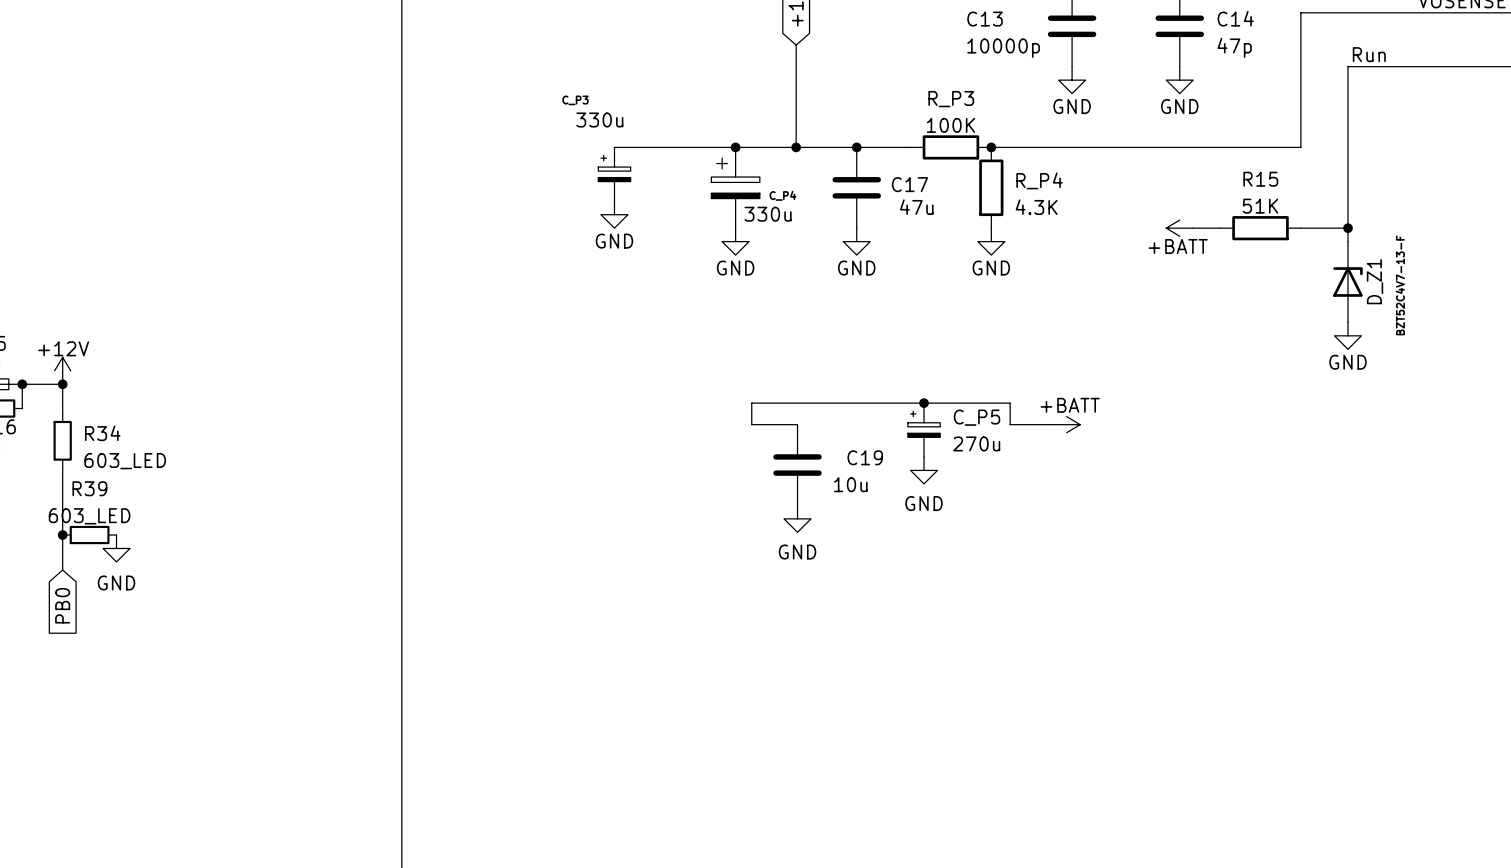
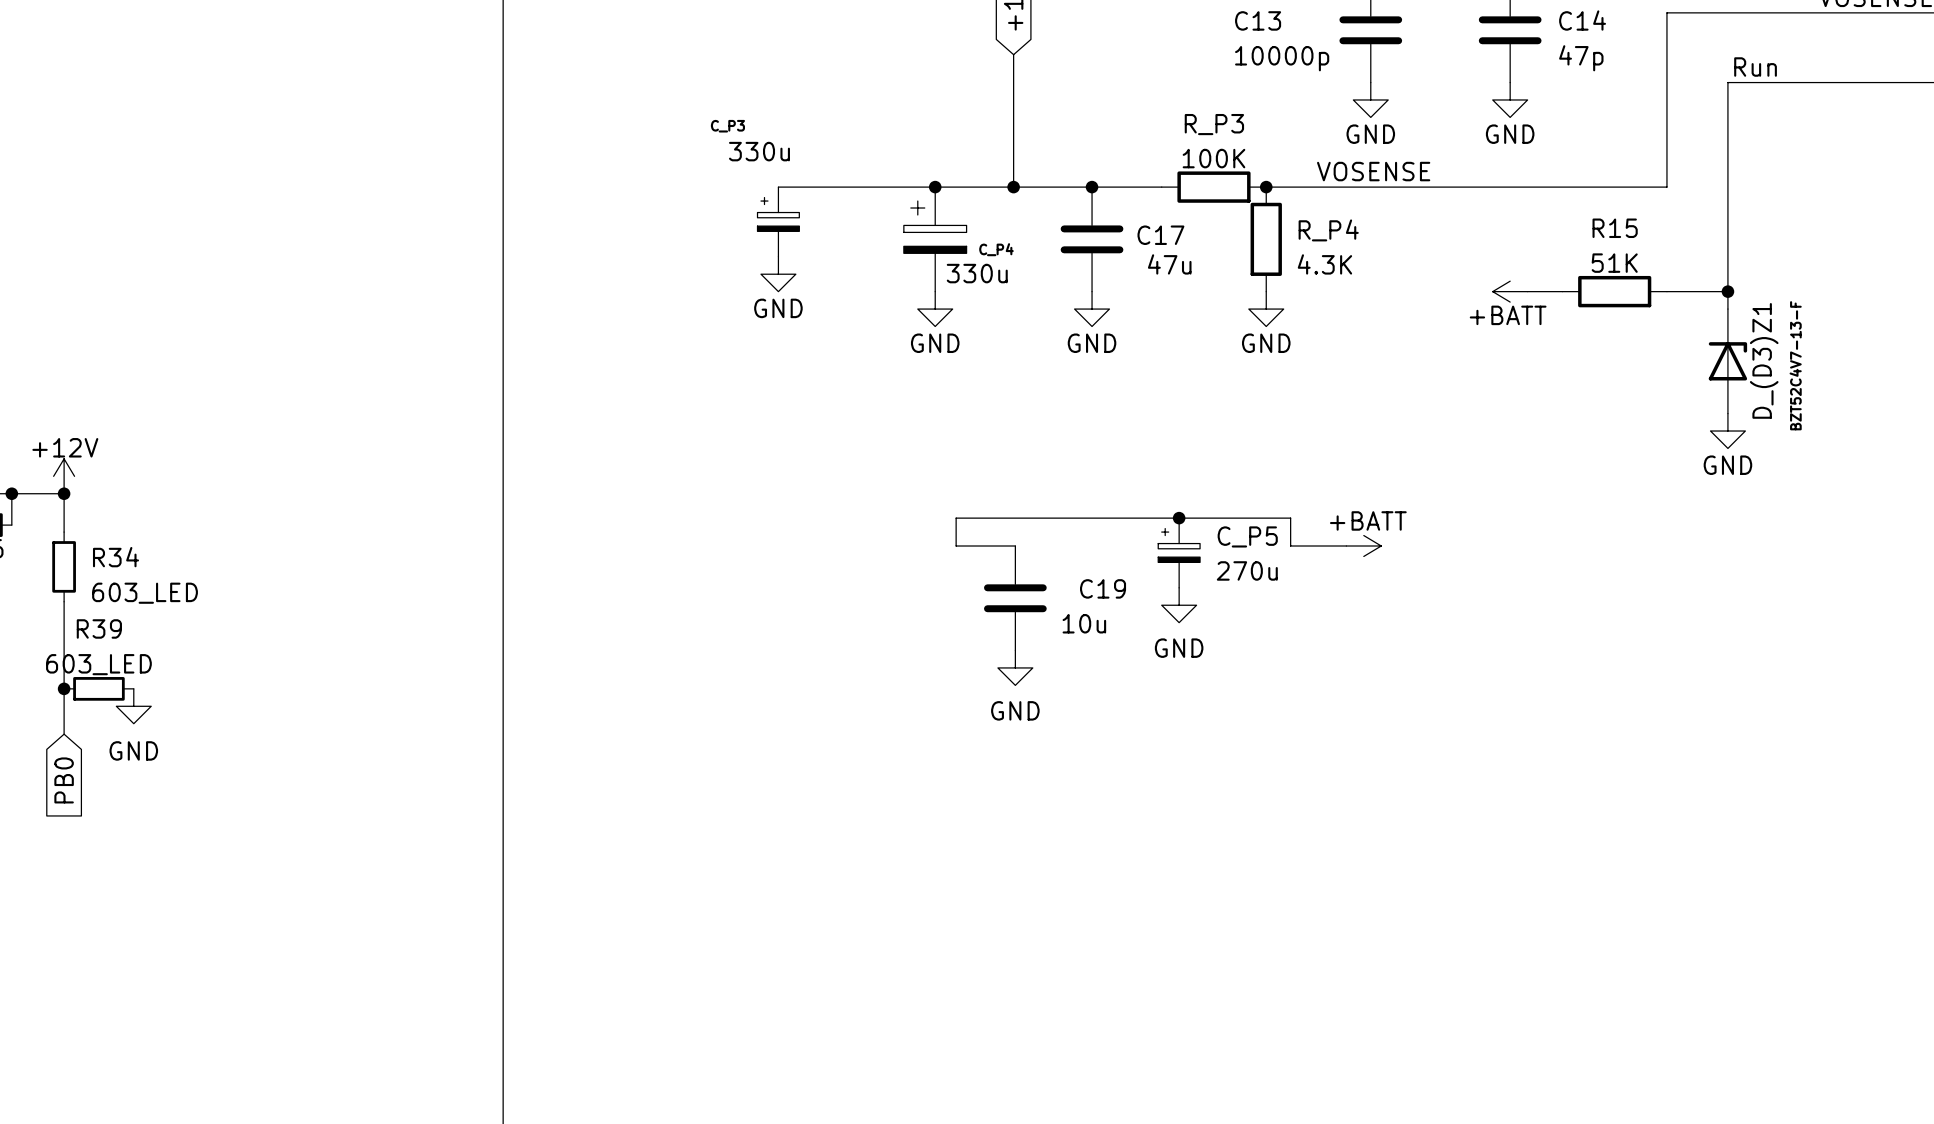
label: none -> VOSENSE (1373, 171)
D_Z1 name: D_Z1 (1375, 281) -> D_(D3)Z1 (1764, 360)

